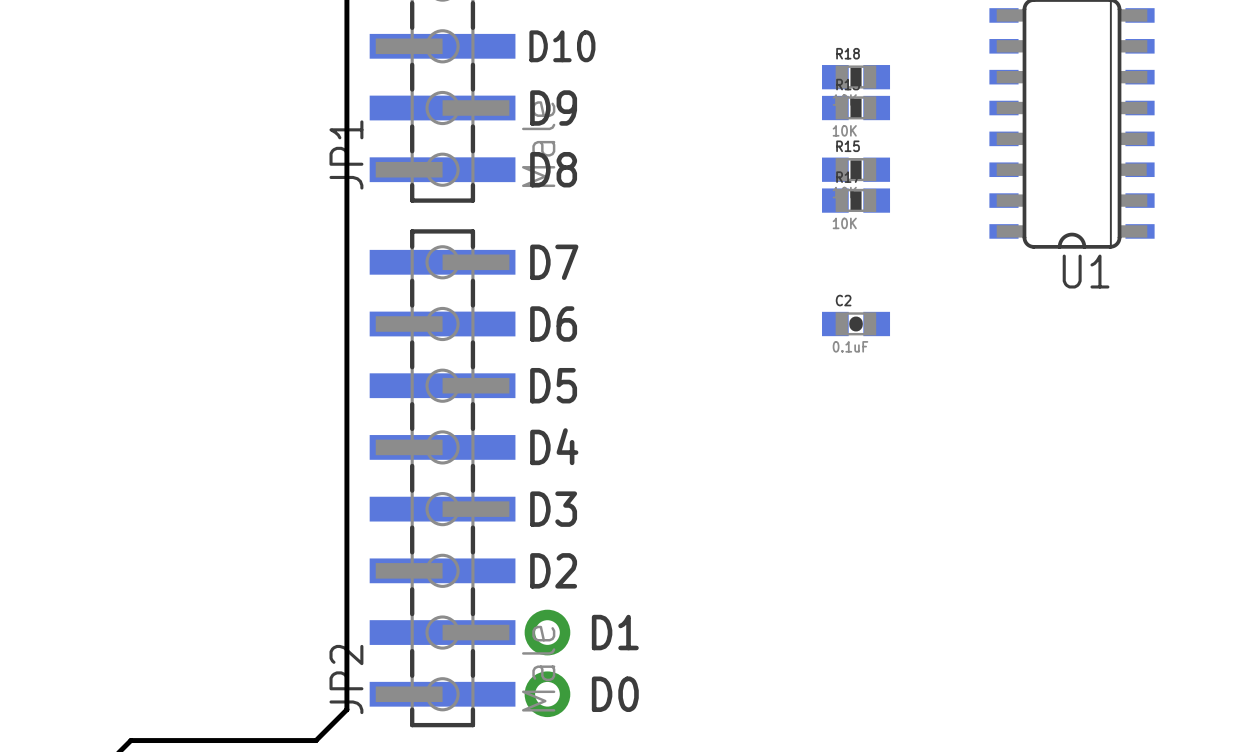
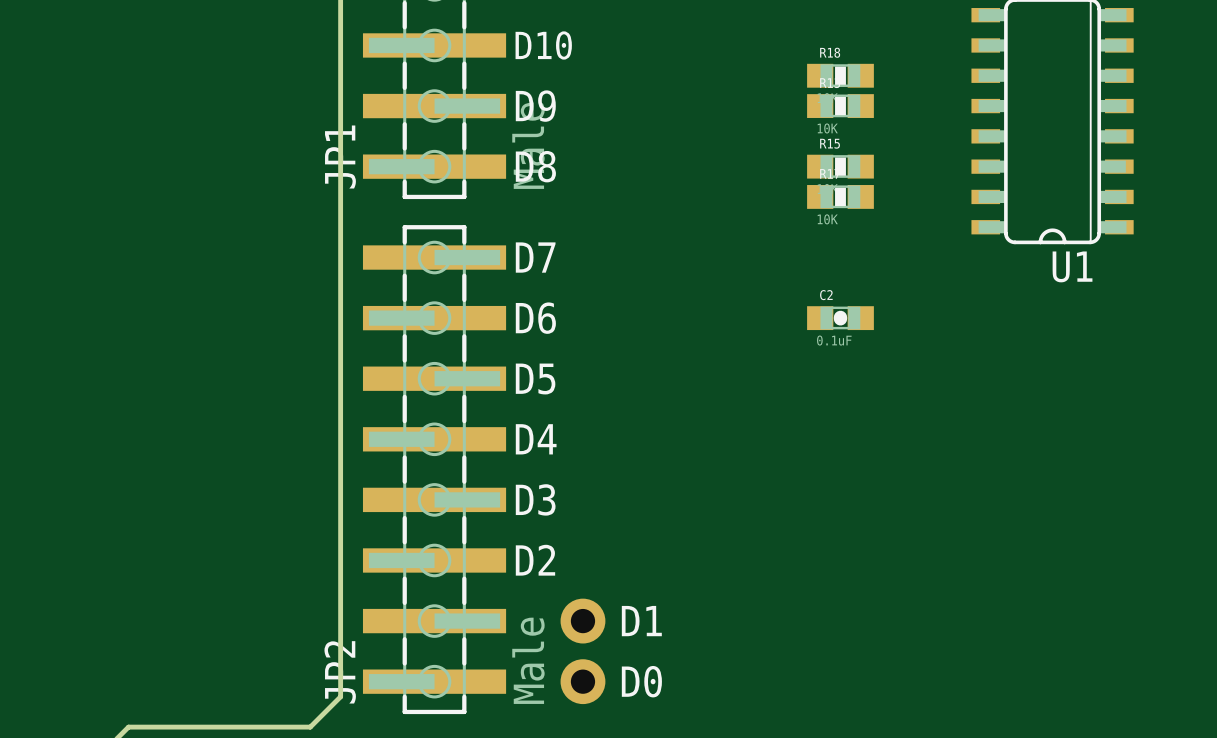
text position: D1 (615, 632) -> D1 (641, 621)
part position: (547, 663) -> (582, 651)
text position: D0 (615, 694) -> D0 (641, 681)

